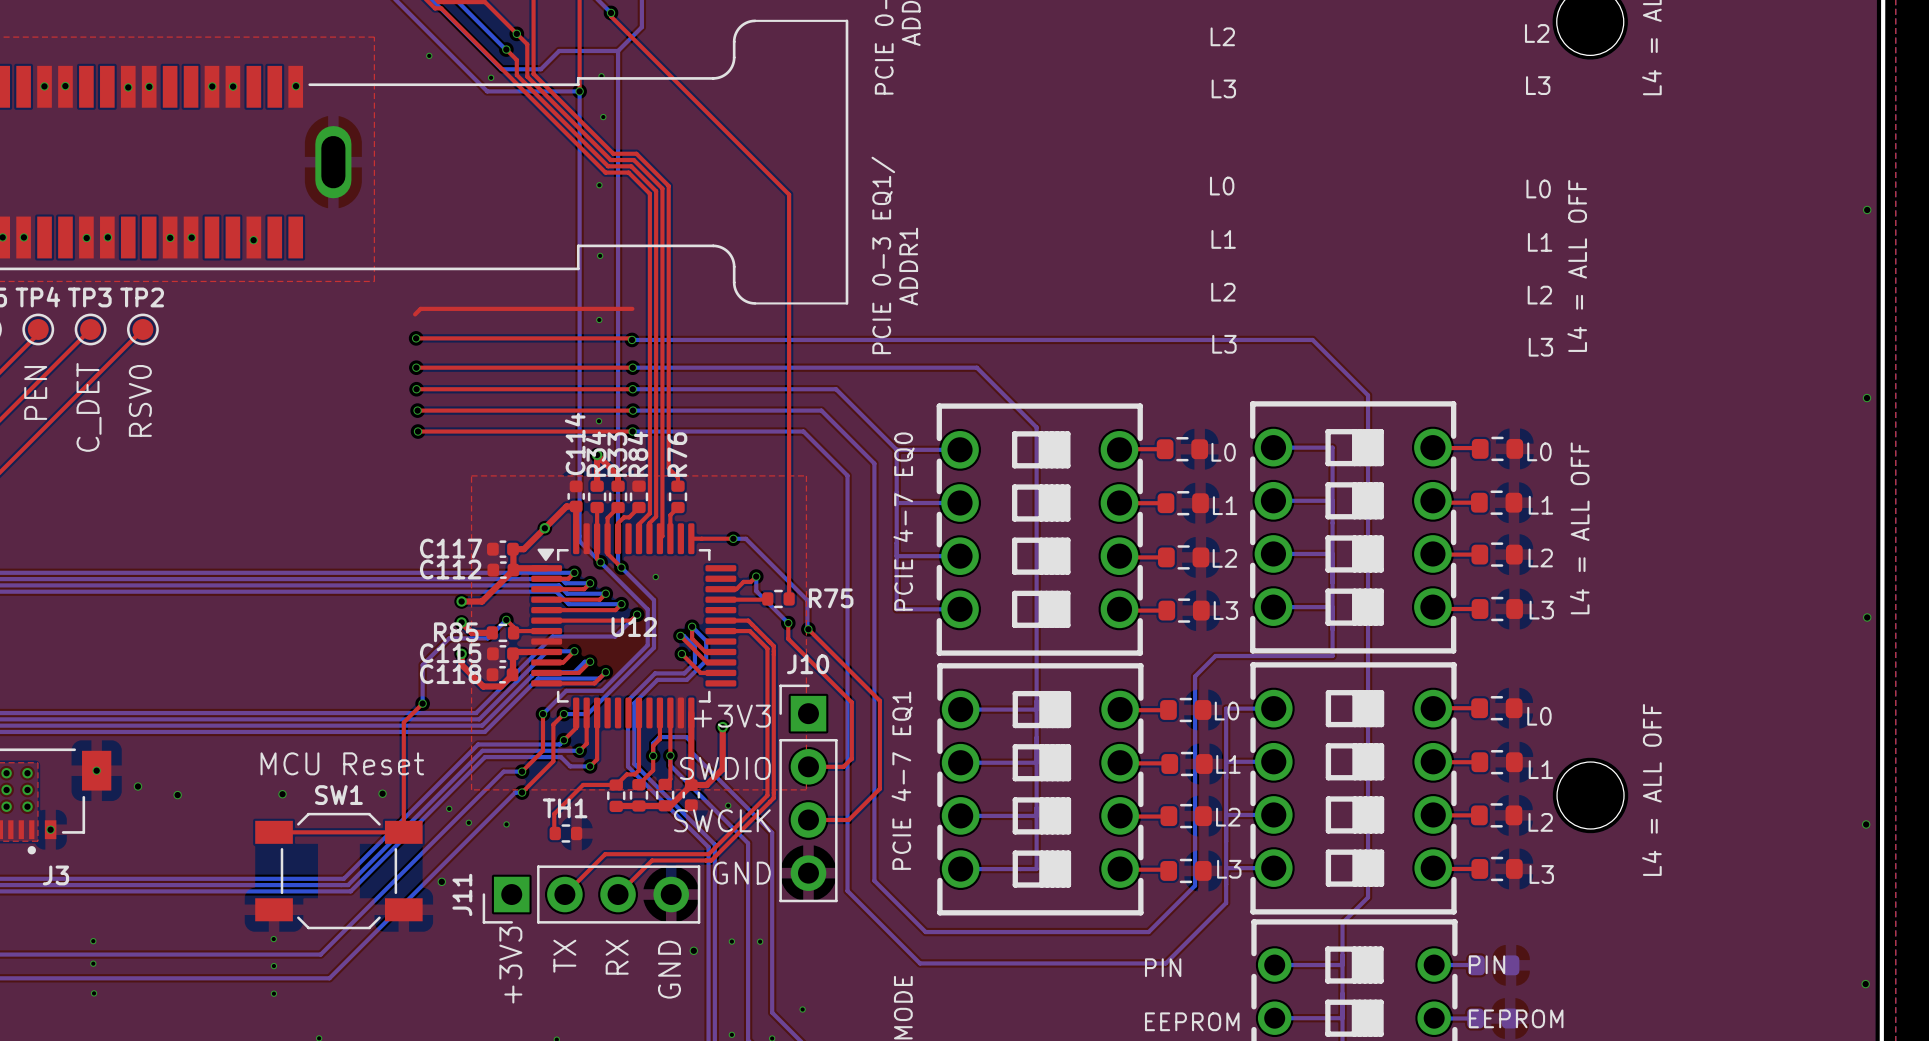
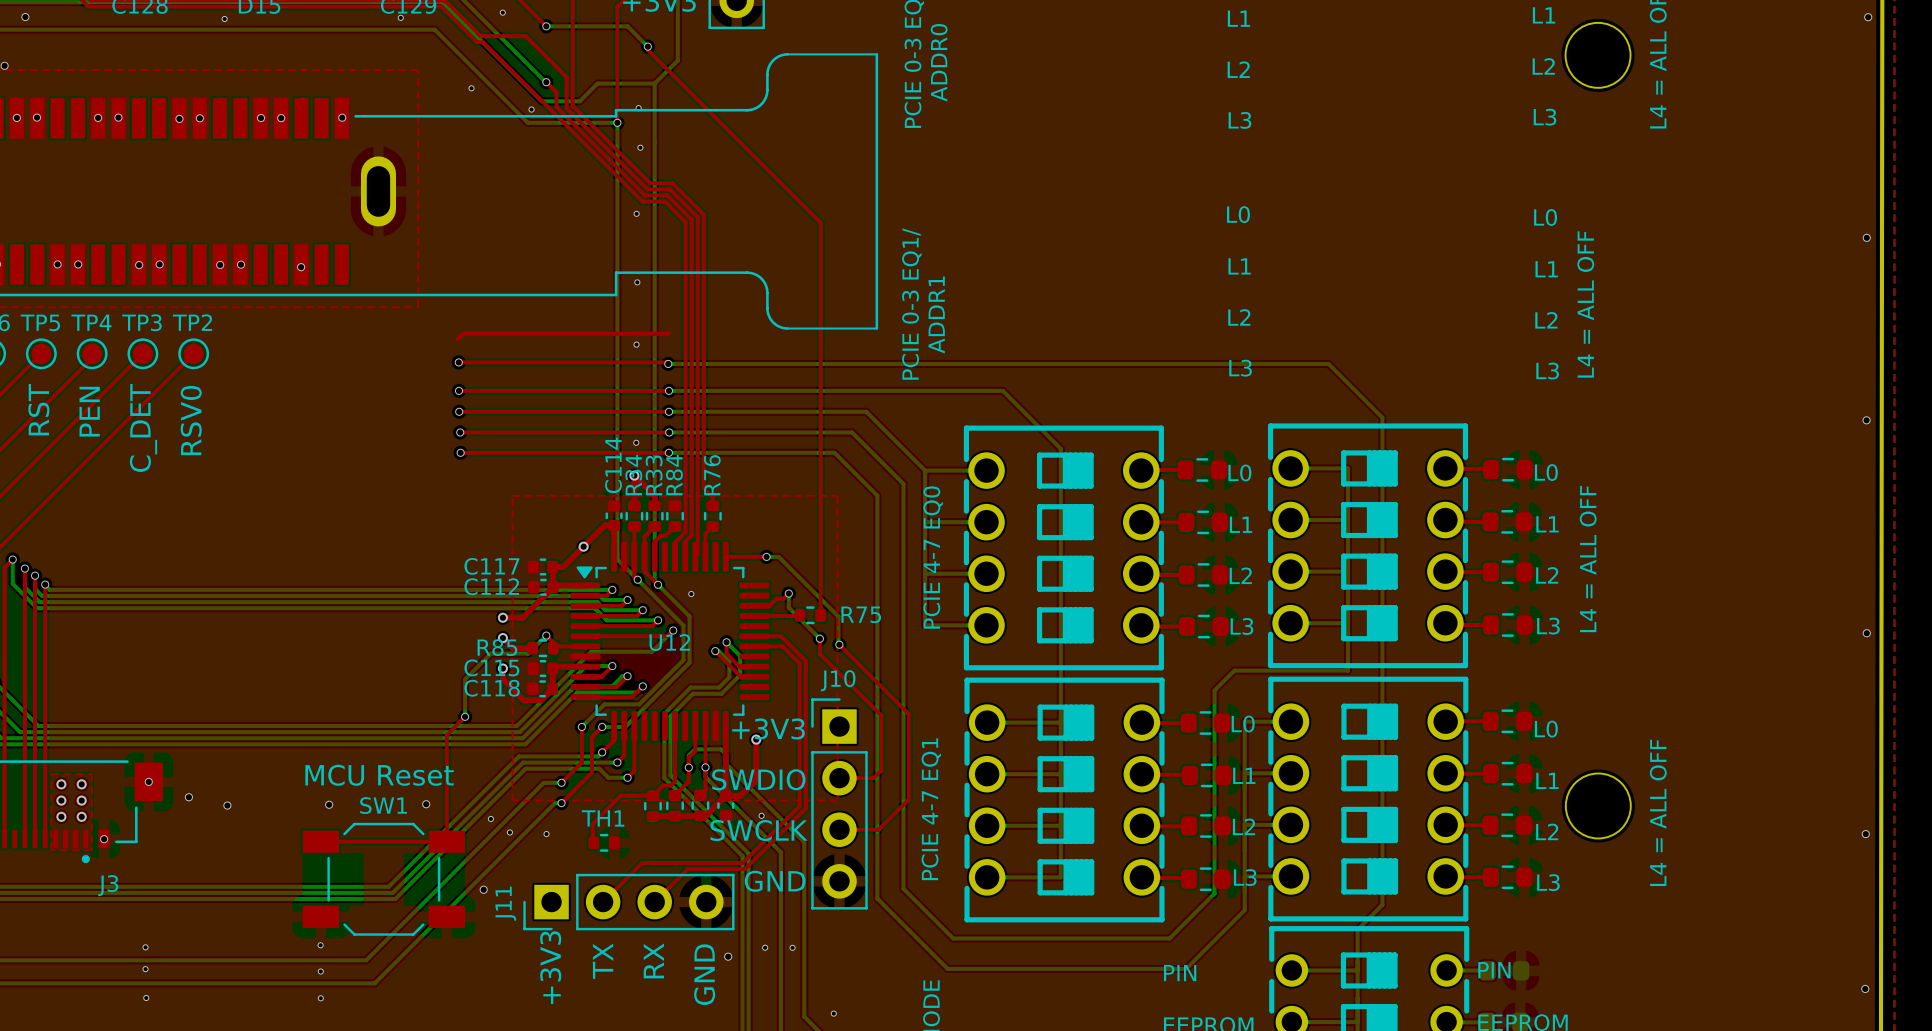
via: (516, 33) -> none
top track: (681, 654) (700, 672) (720, 672) -> none
via: (681, 654) -> none

